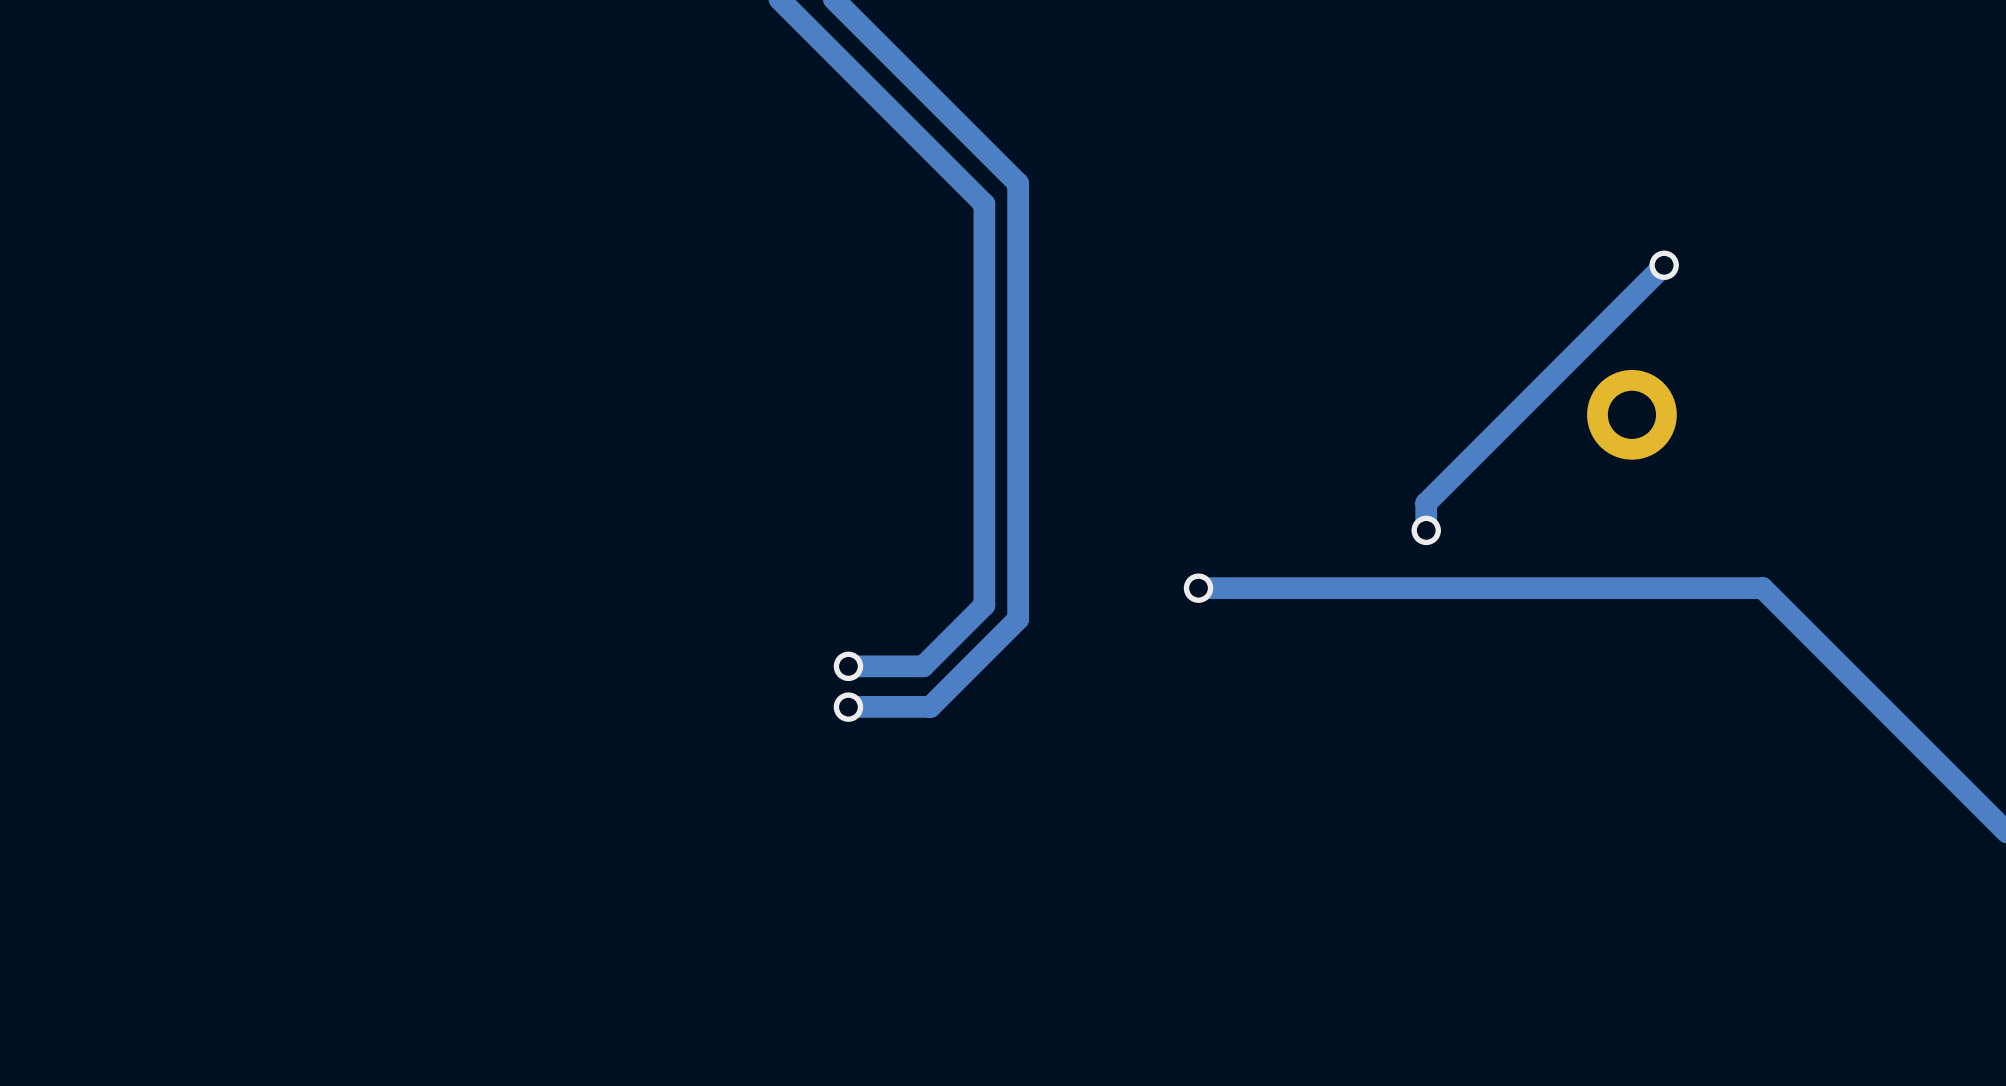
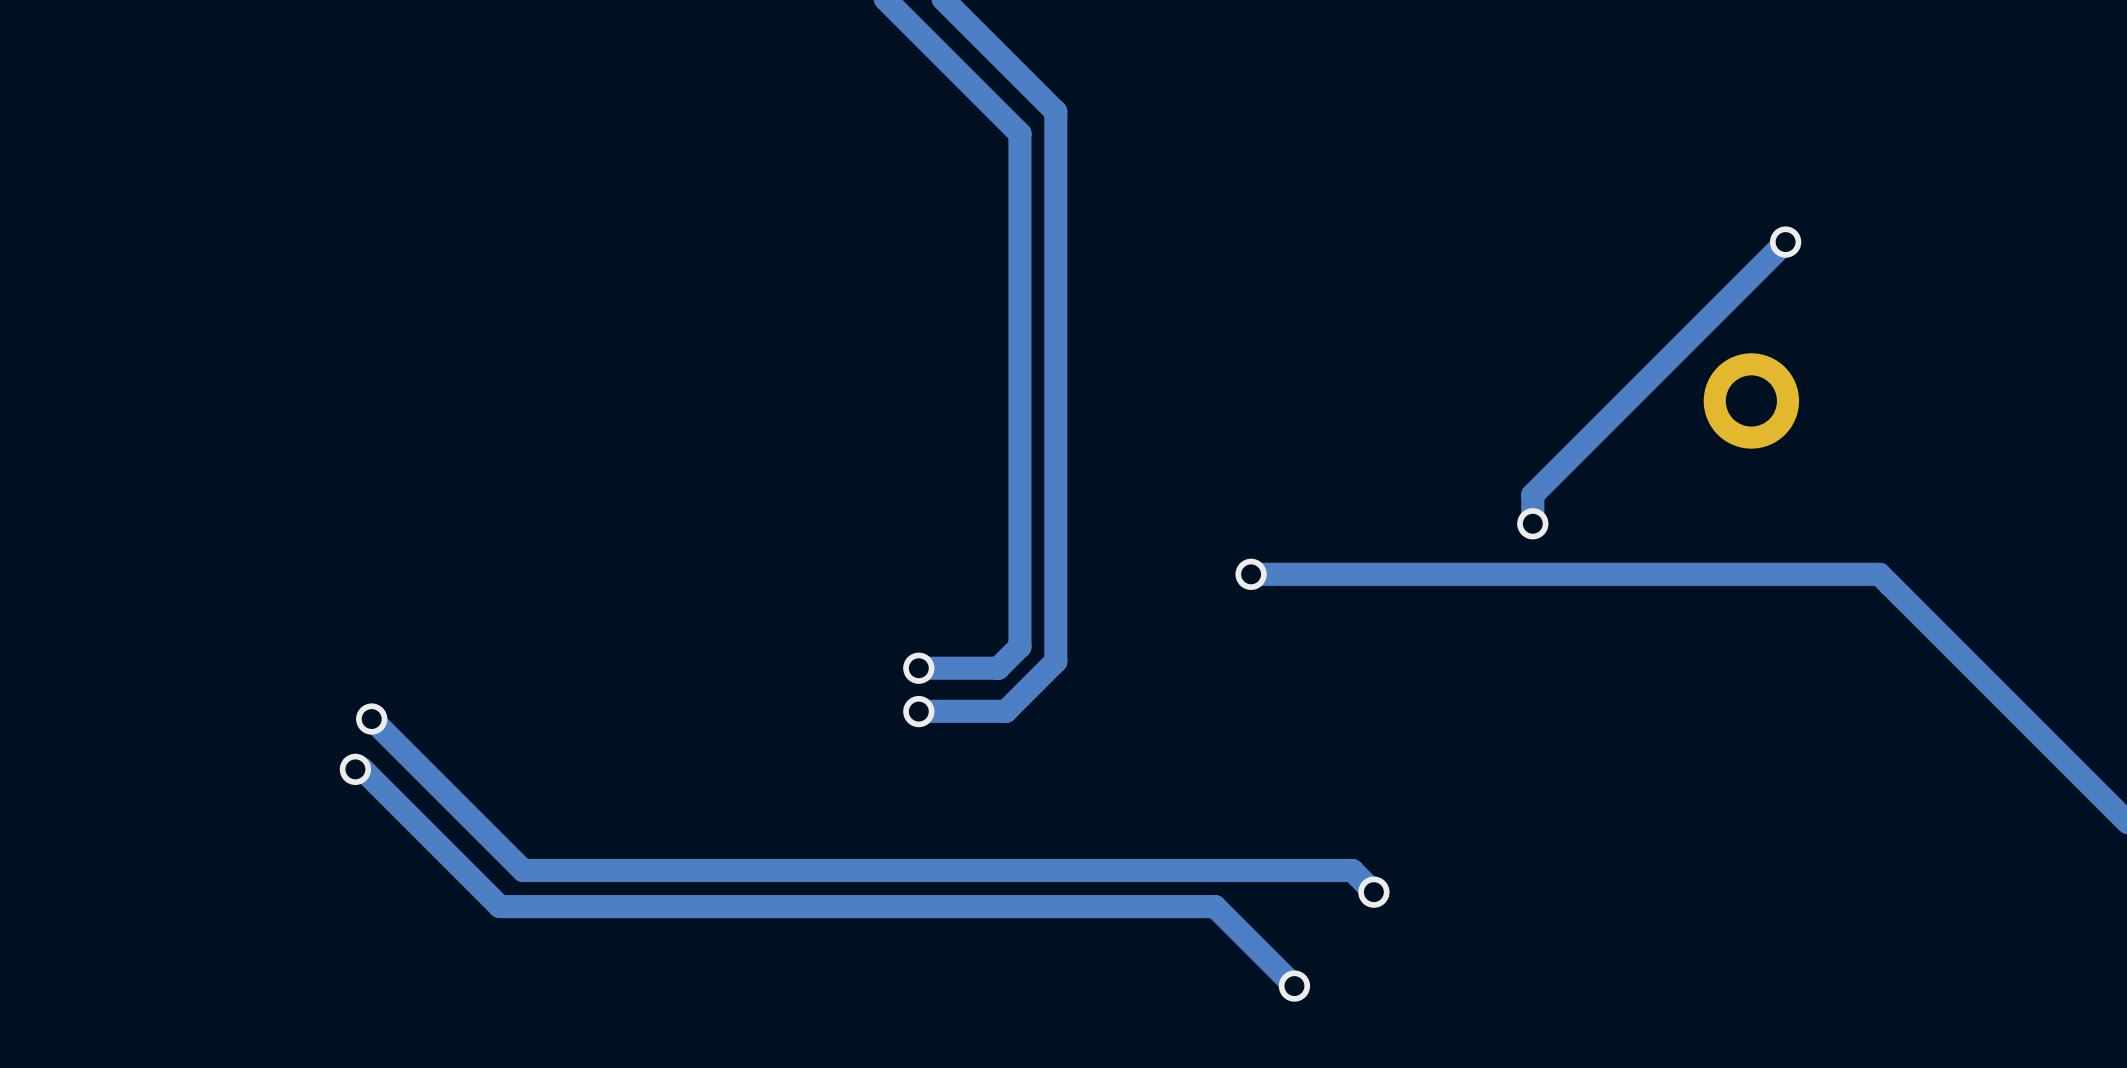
track: (977, 142) (1018, 183) (1018, 619) (977, 659) -> (1055, 111) (1055, 661)
track: (943, 163) (984, 204) (984, 605) (943, 645) -> (1019, 133) (1019, 646)
via position: (1198, 588) -> (1251, 574)
track: (1762, 588) (1198, 588) -> (1890, 585) (1879, 574) (1251, 574)
track: none -> (371, 719) (523, 870) (1352, 870) (1373, 892)
via: none -> (371, 719)
track: none -> (355, 769) (362, 769) (499, 906) (1214, 906) (1294, 986)
via: none -> (355, 769)
via: none -> (1373, 892)
via: none -> (1294, 986)

